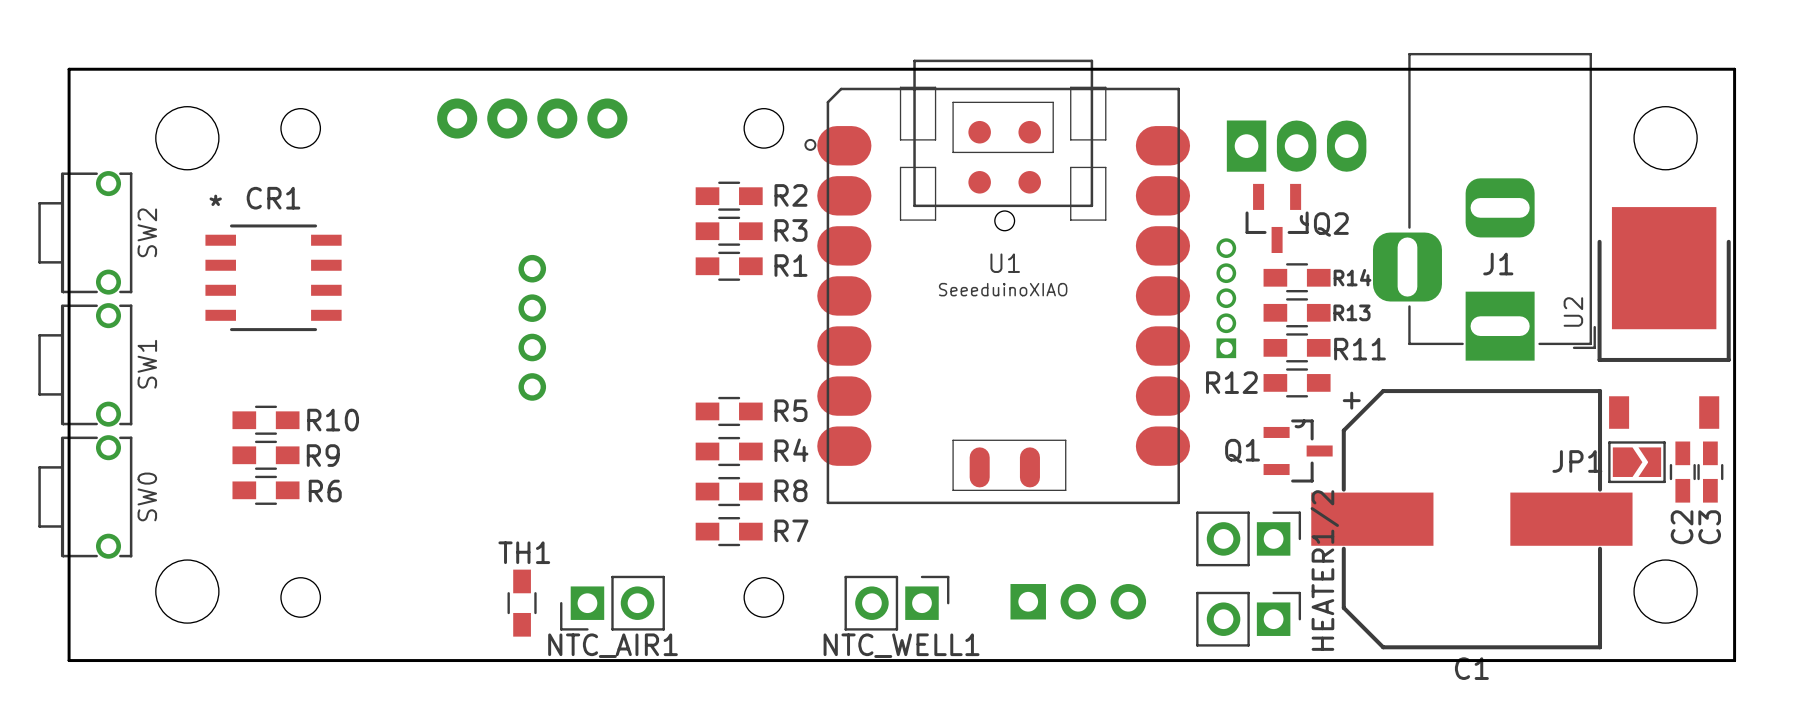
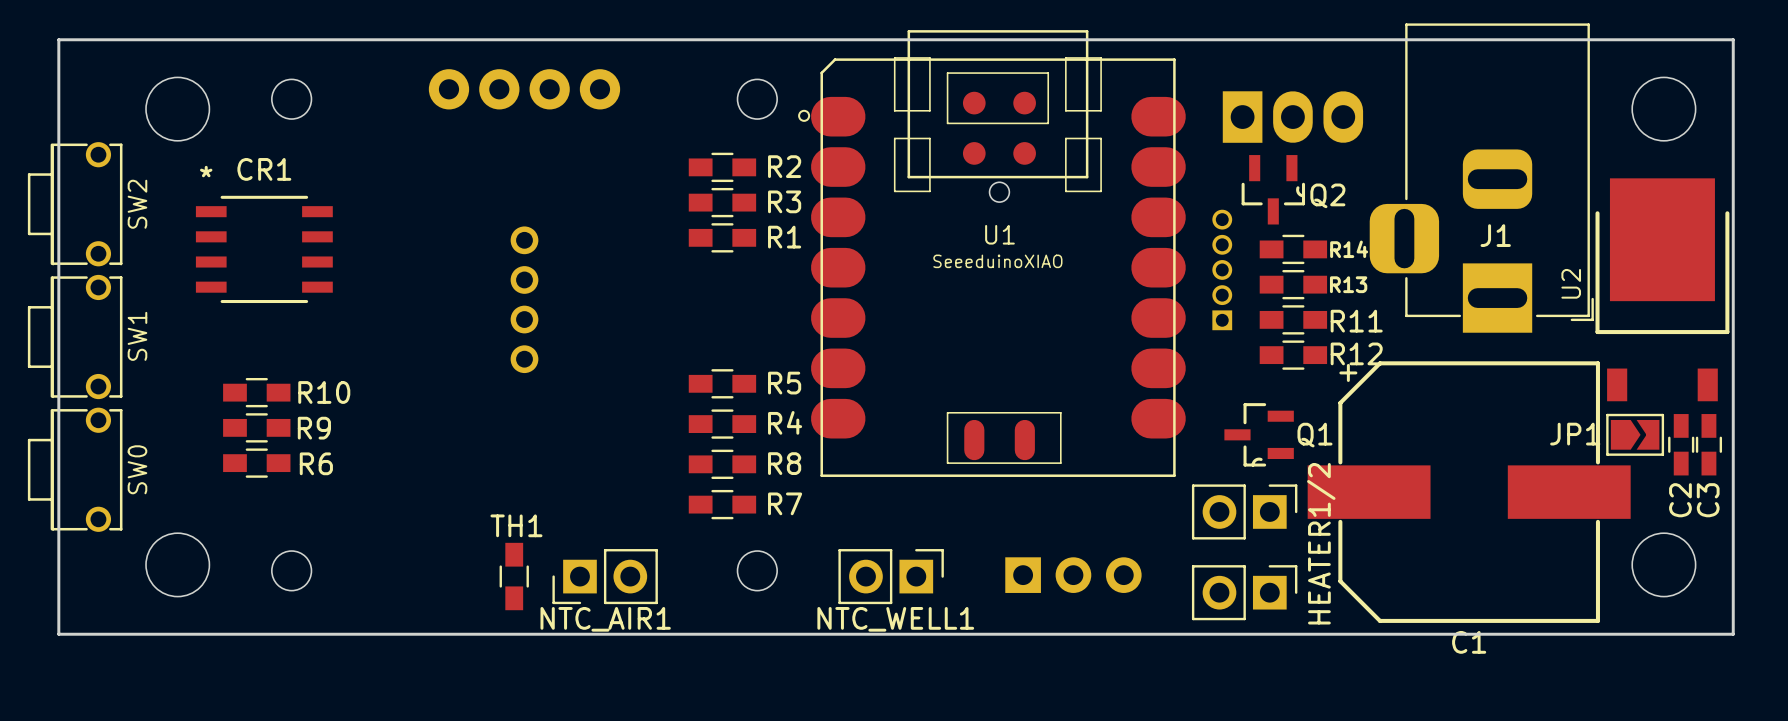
R12 name position: R12 (1231, 382) -> R12 (1356, 353)
Q1 rotation: 0° (1298, 450) -> 180° (1259, 434)

